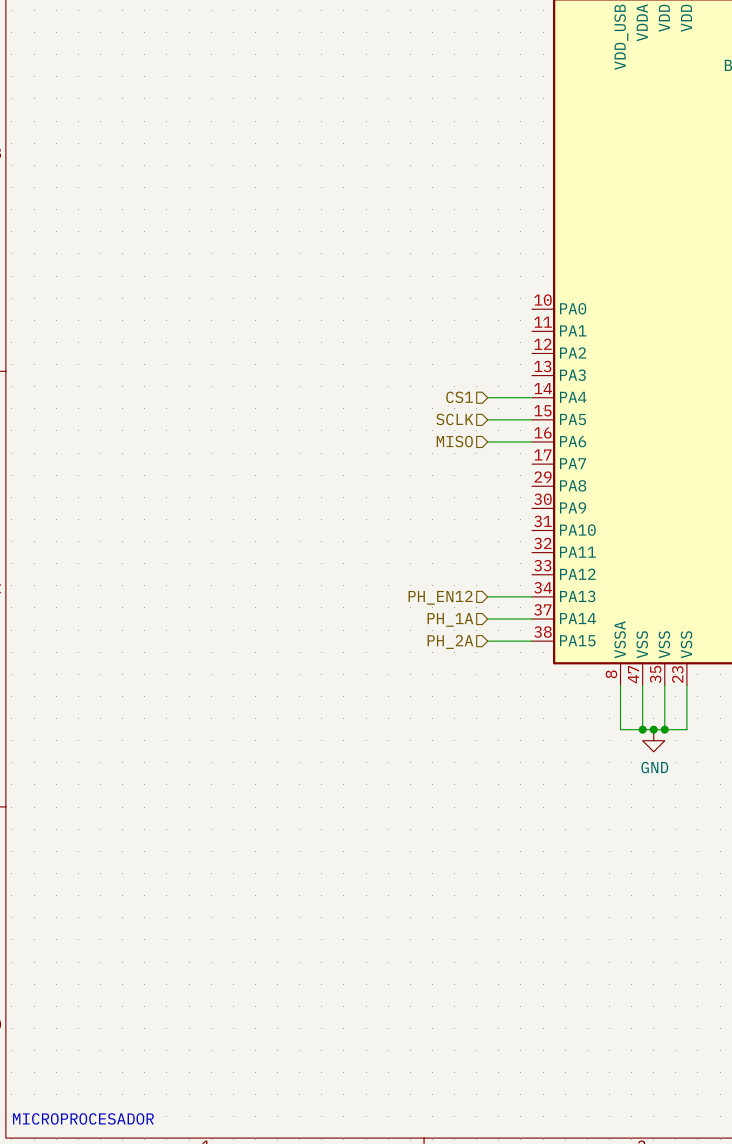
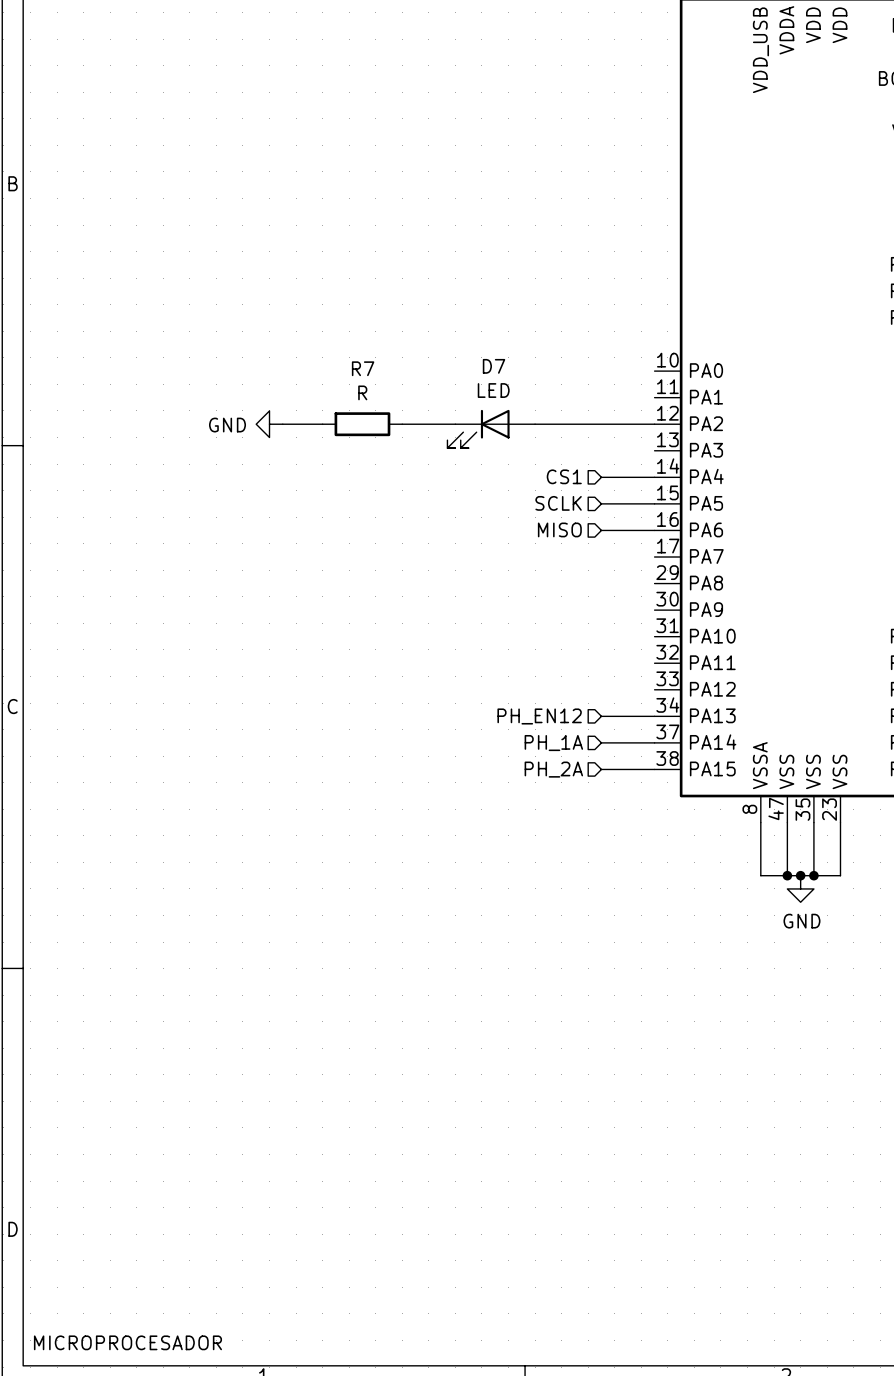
power symbol: none -> GND (269, 424)
wire: none -> (282, 424) (322, 424)
R7: none -> R (362, 424)
wire: none -> (402, 424) (455, 424)
wire: none -> (535, 424) (654, 424)
D7: none -> LED (491, 429)

